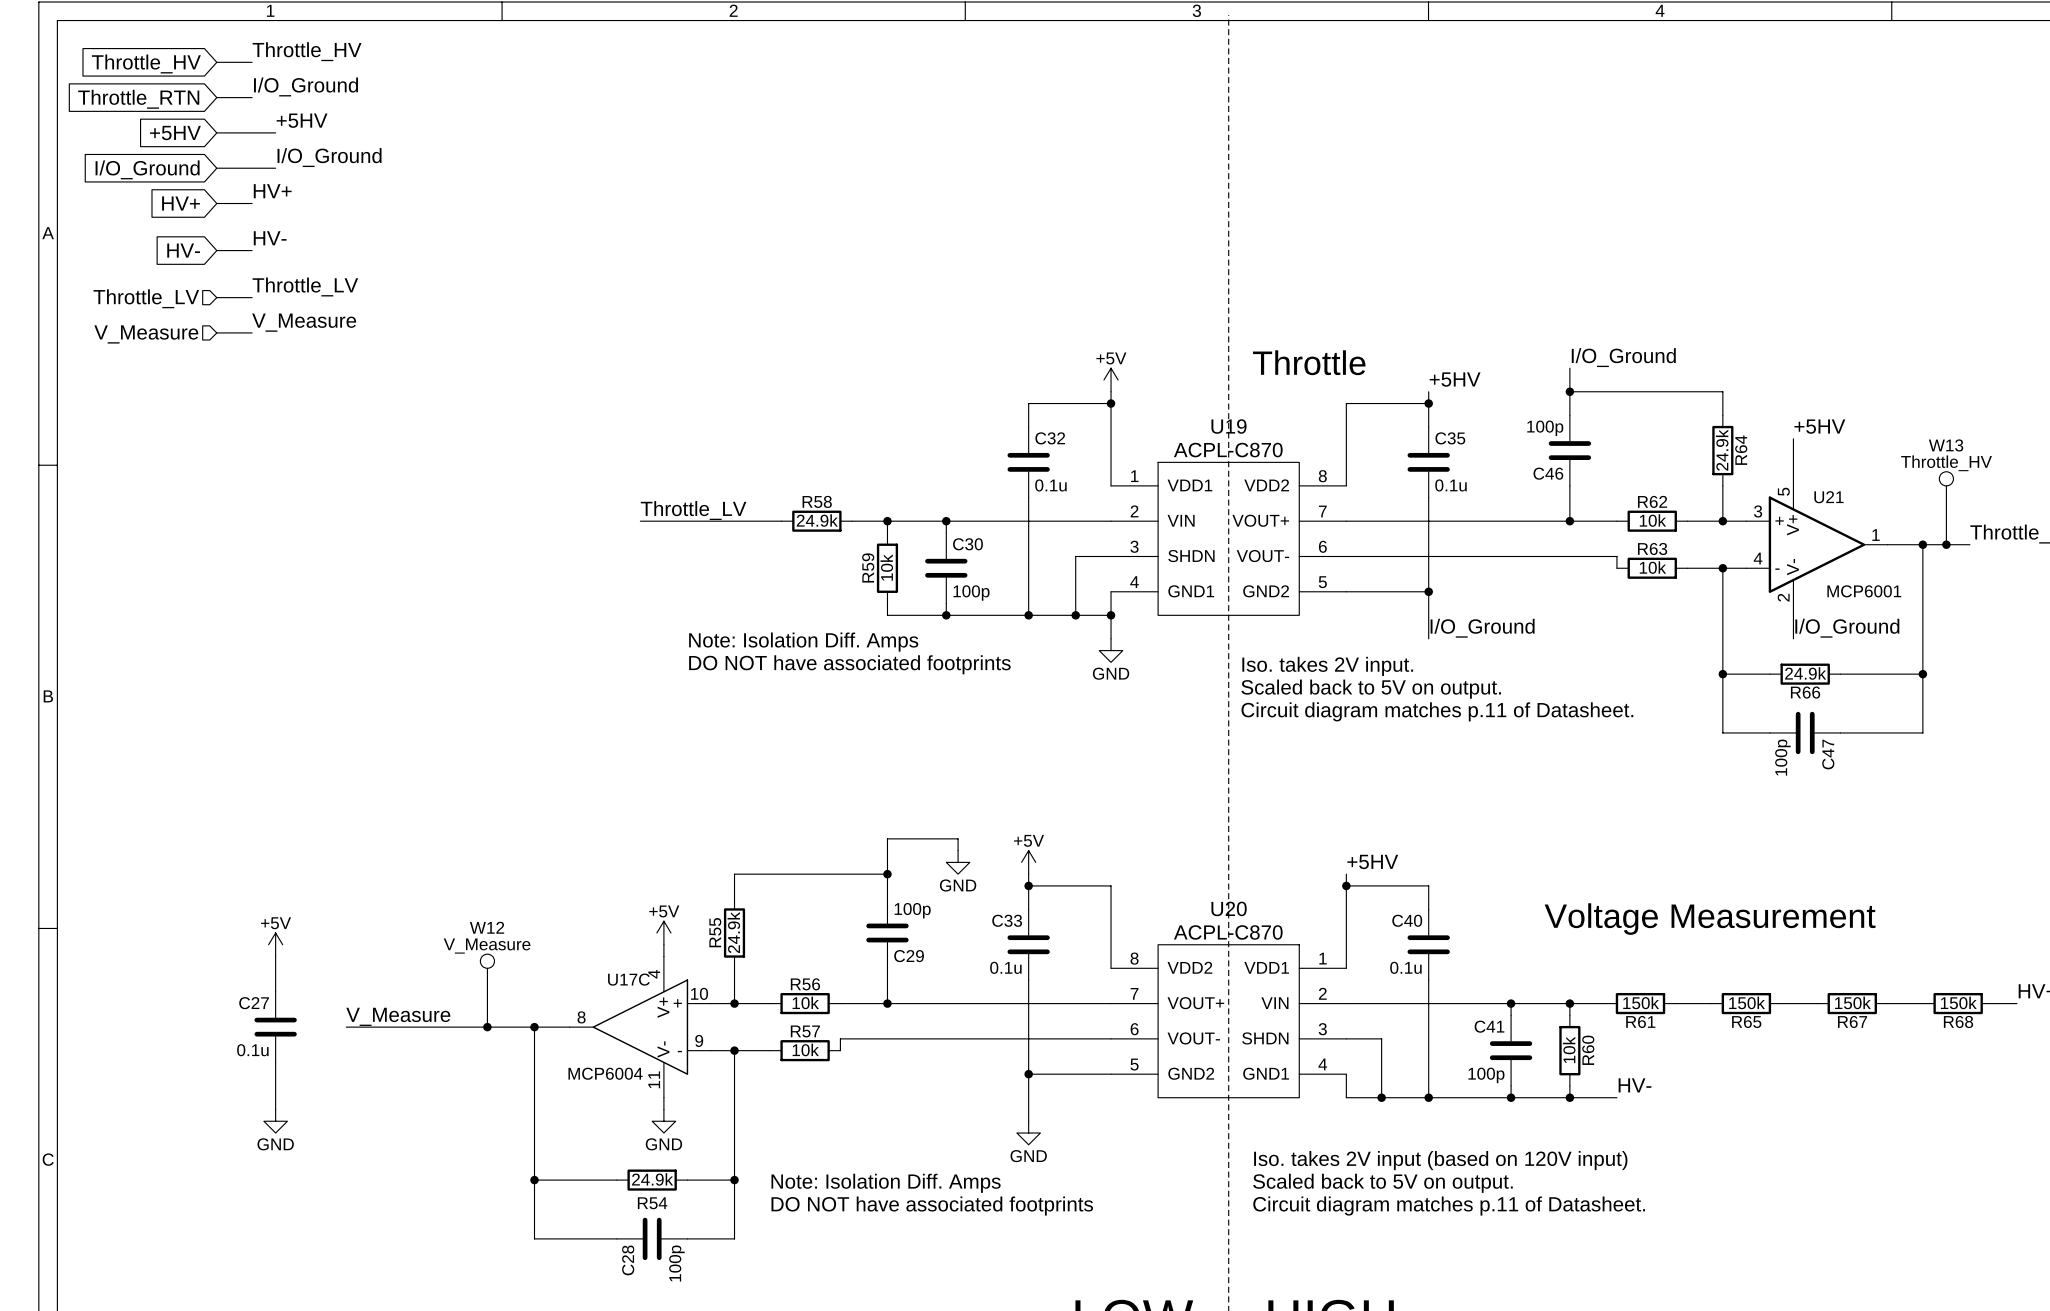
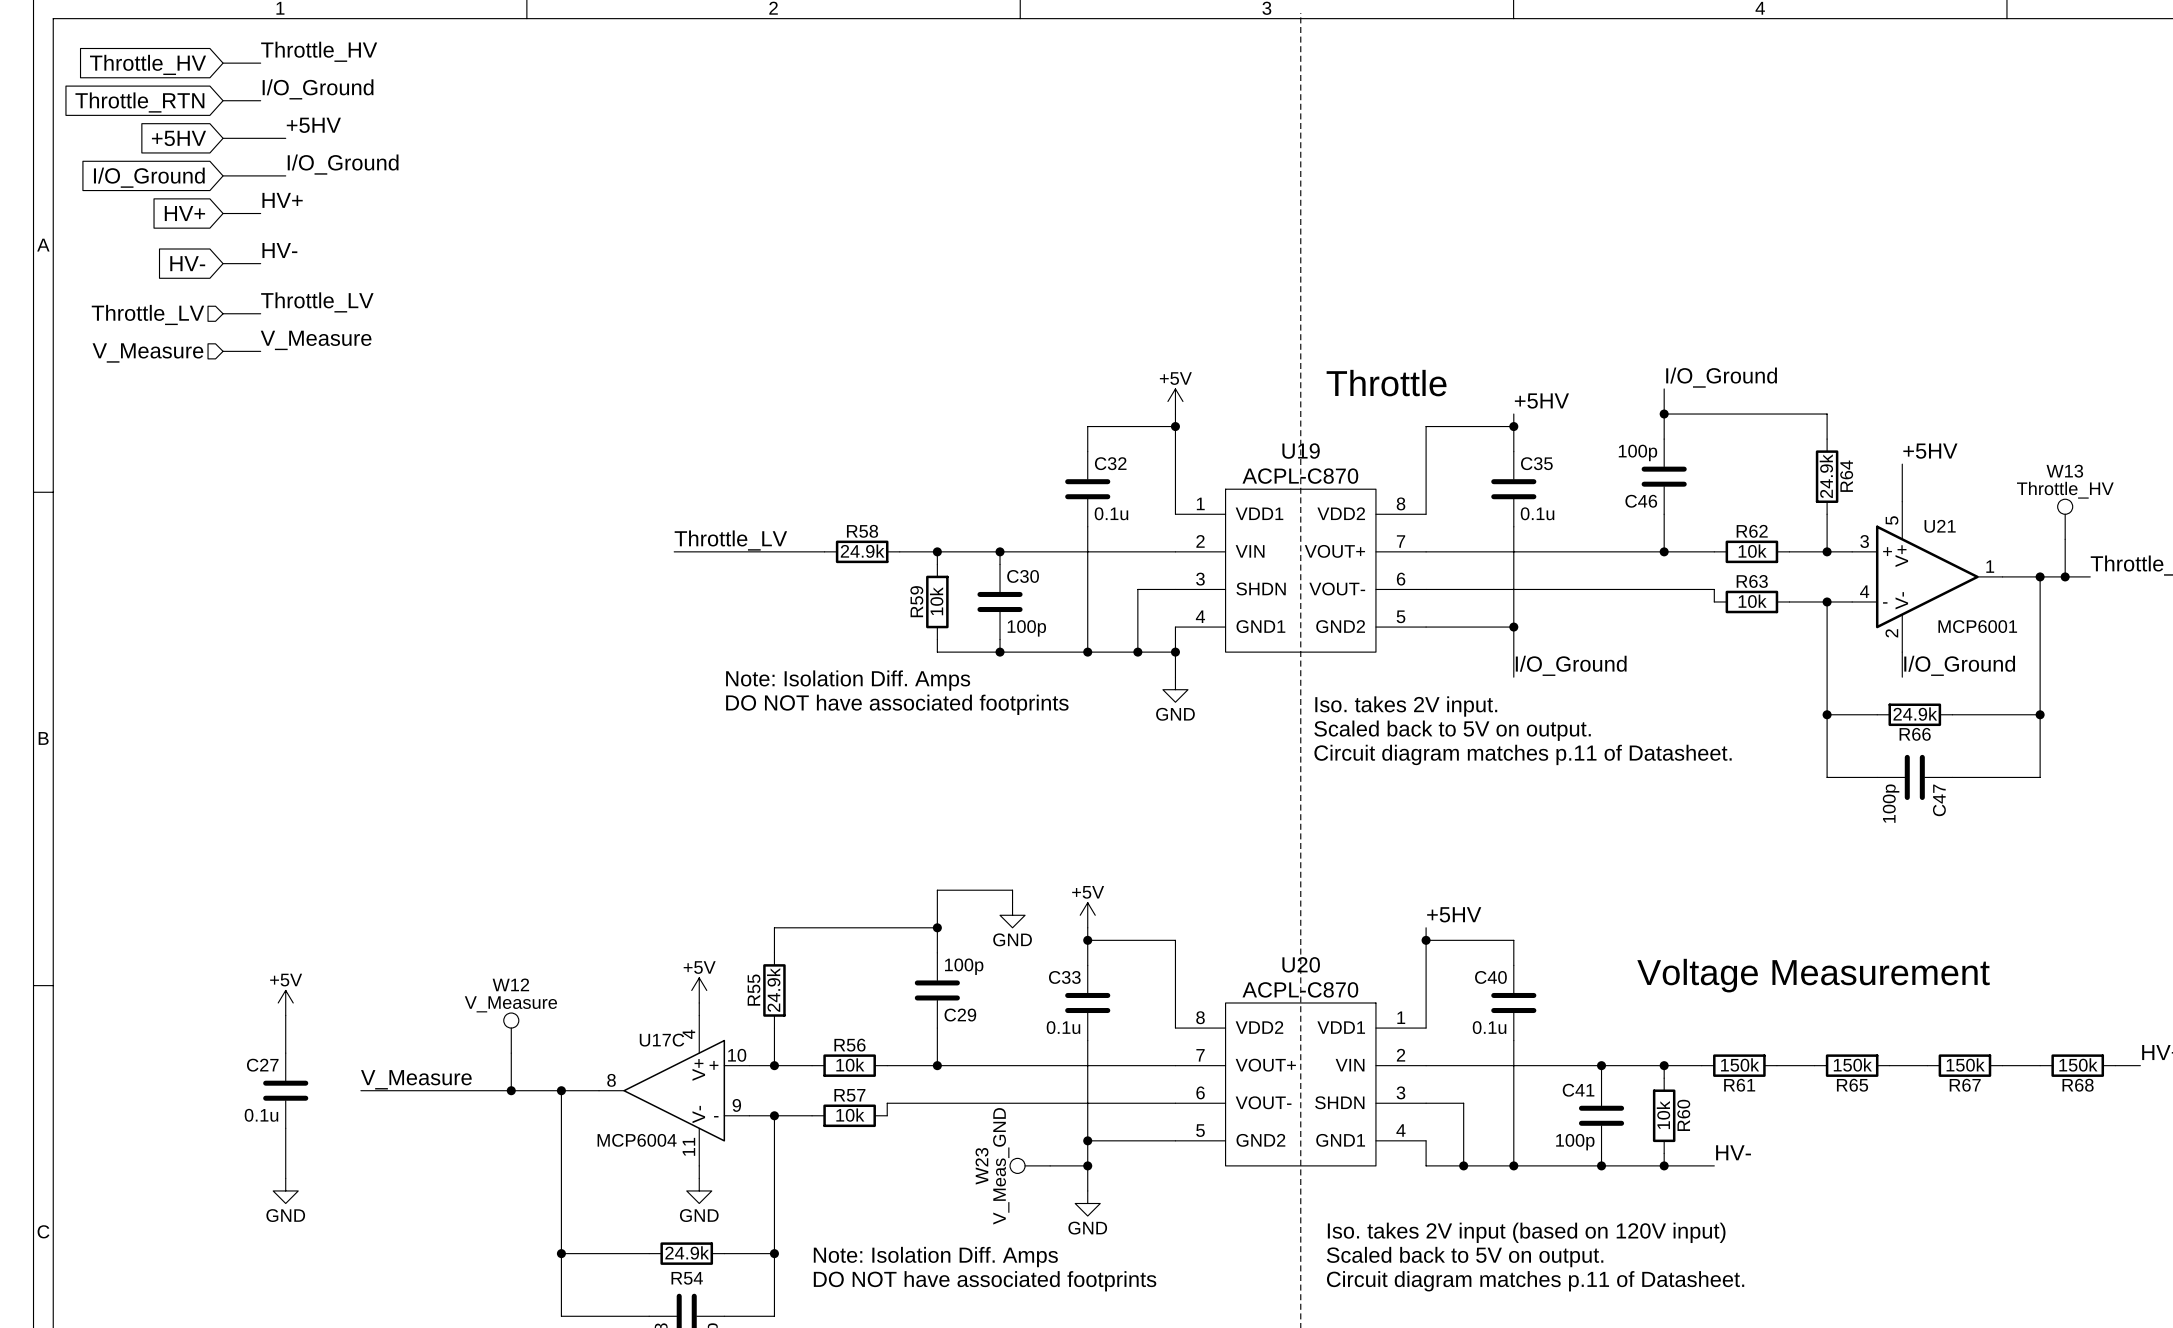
W23: none -> V_Meas_GND (1030, 1165)
wire: none -> (1050, 1165) (1087, 1165)
junction: none -> (1087, 1165)

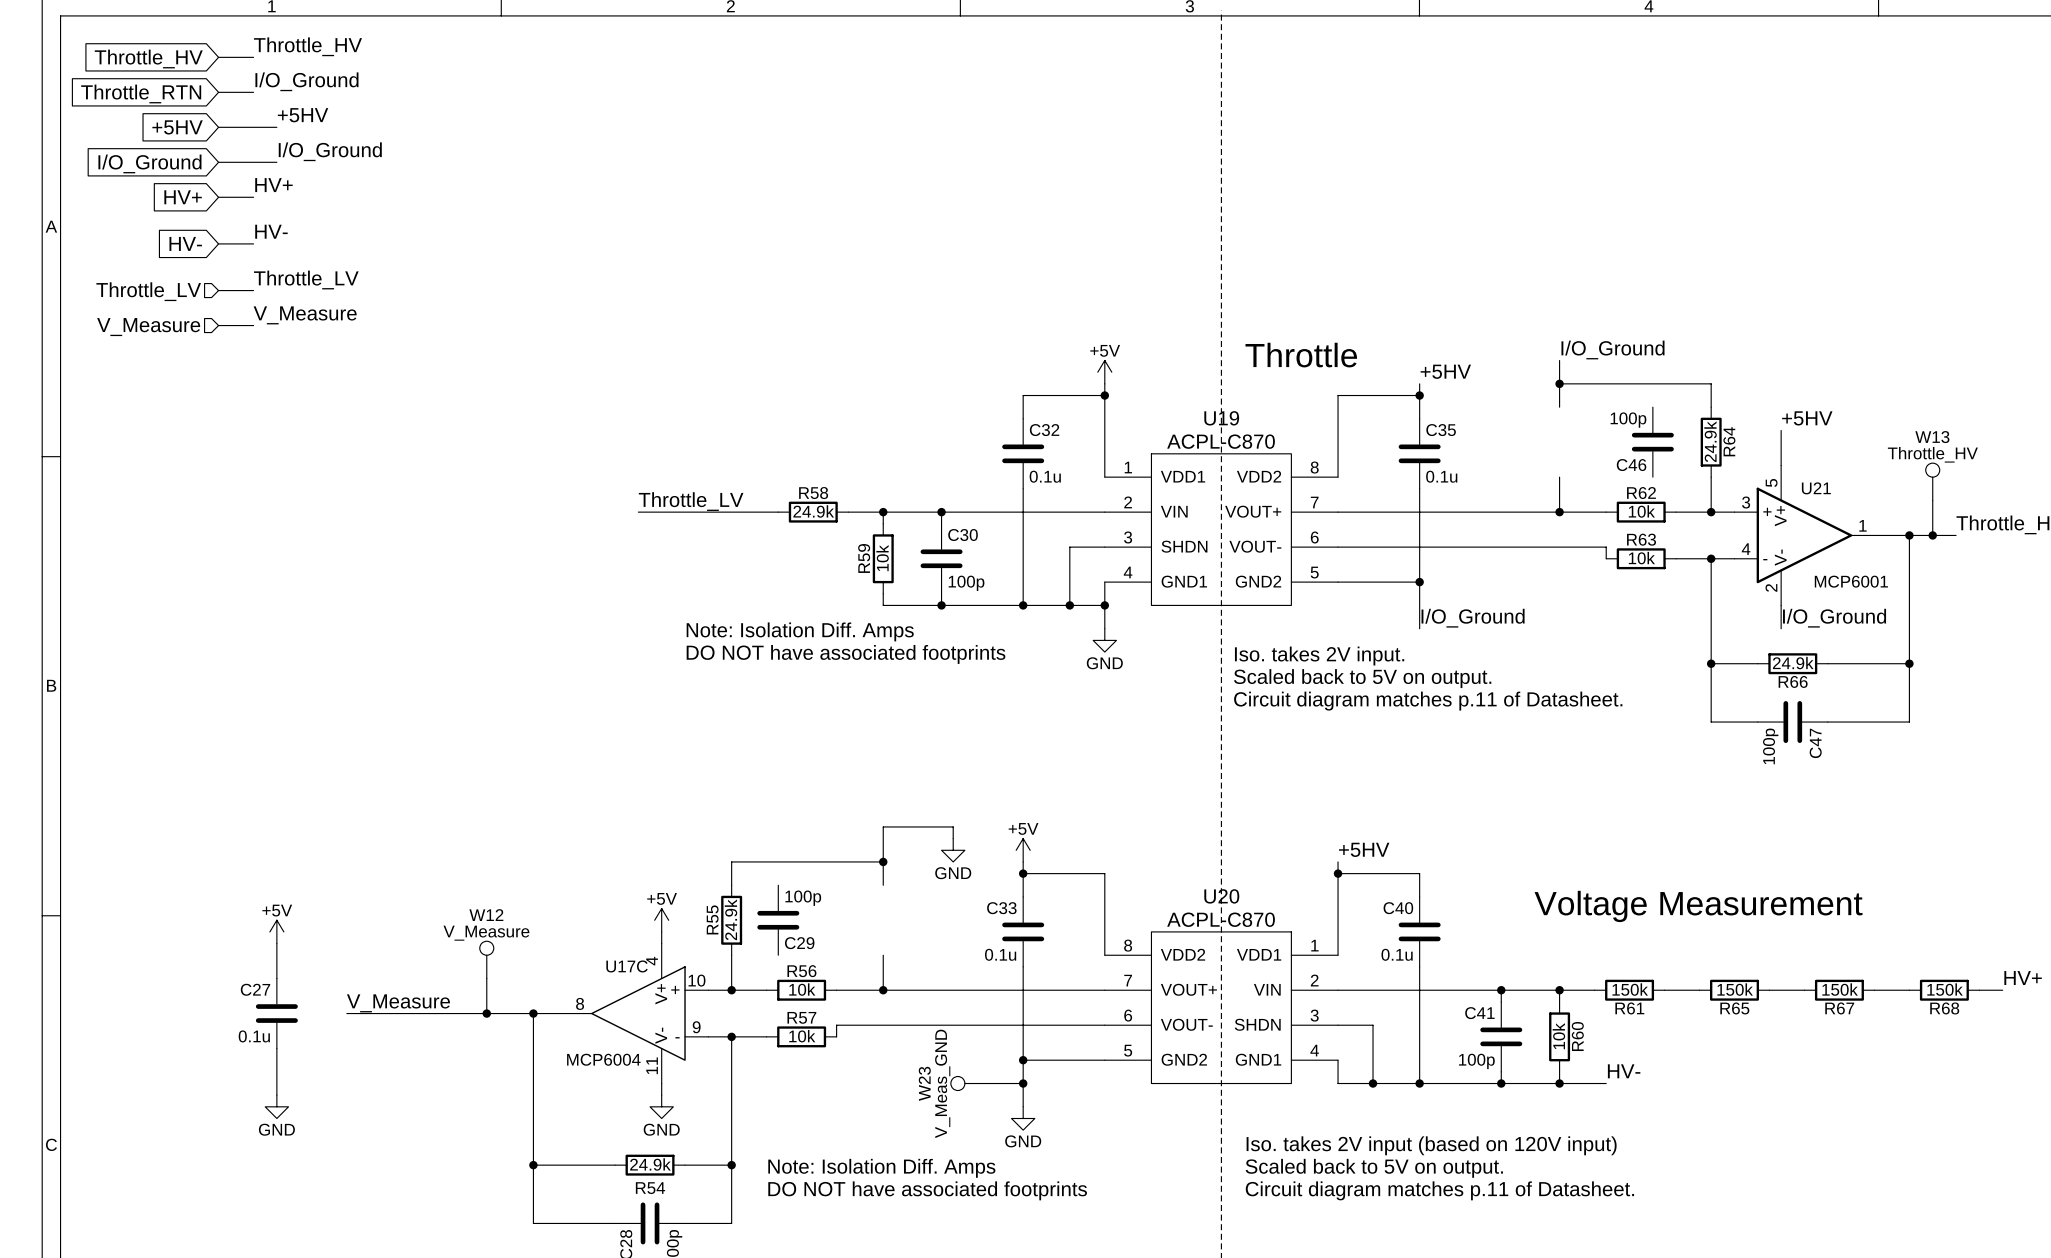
C46 position: (1664, 476) -> (1652, 442)
C29 position: (937, 990) -> (778, 920)

